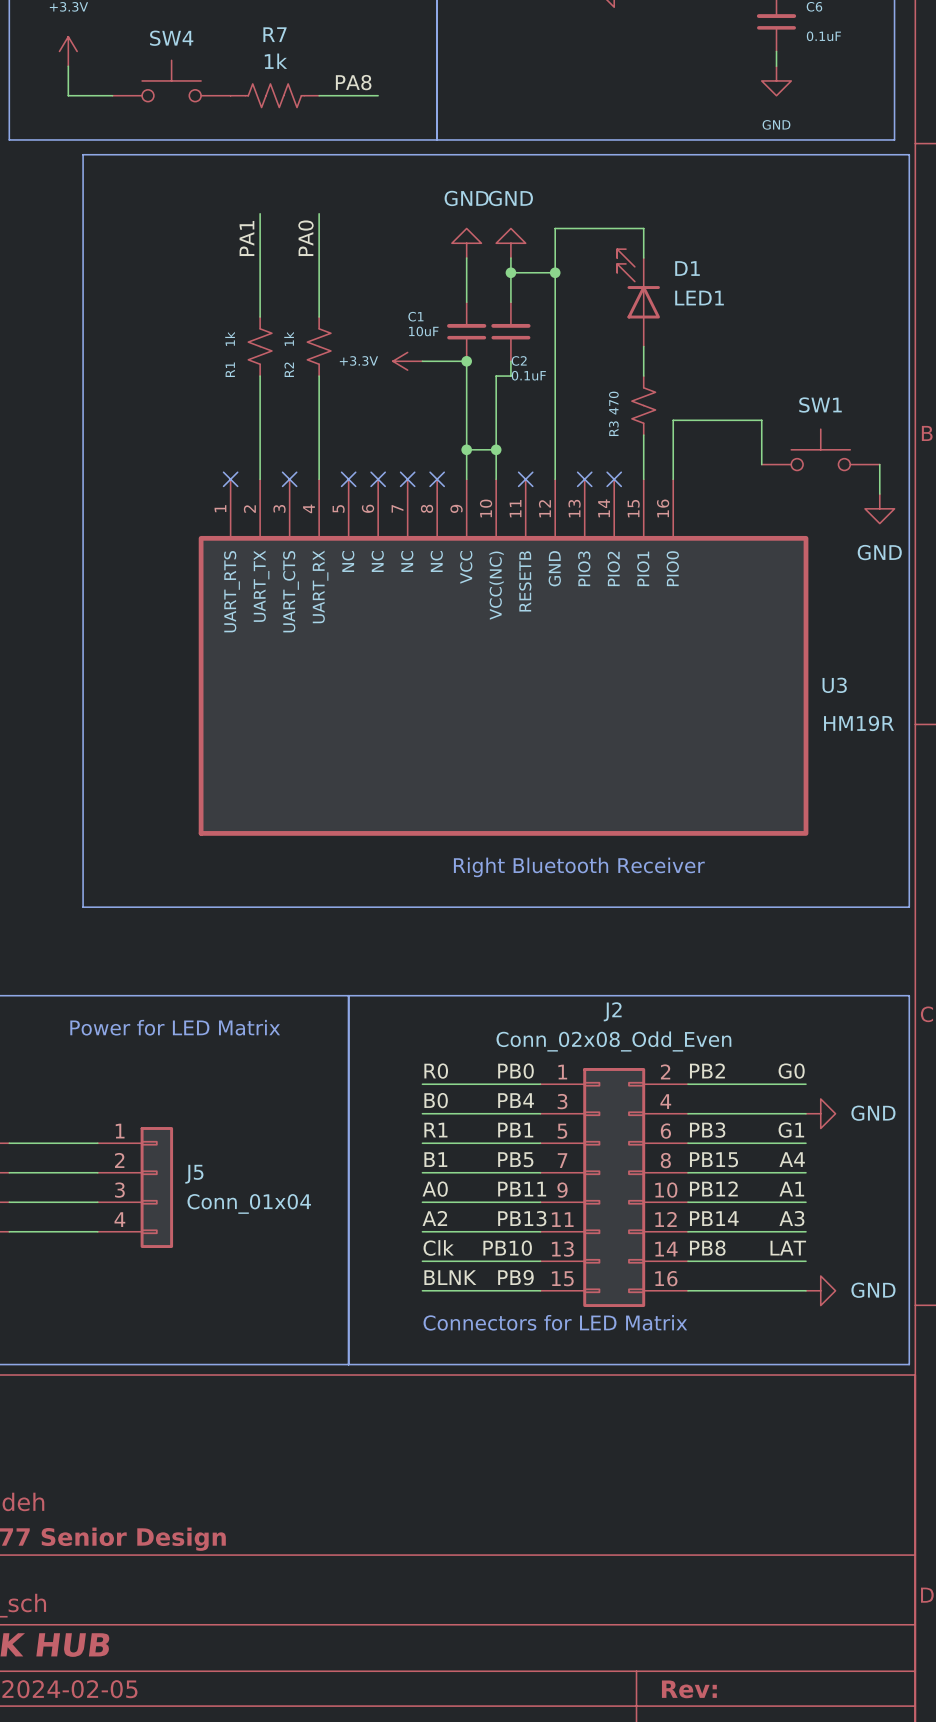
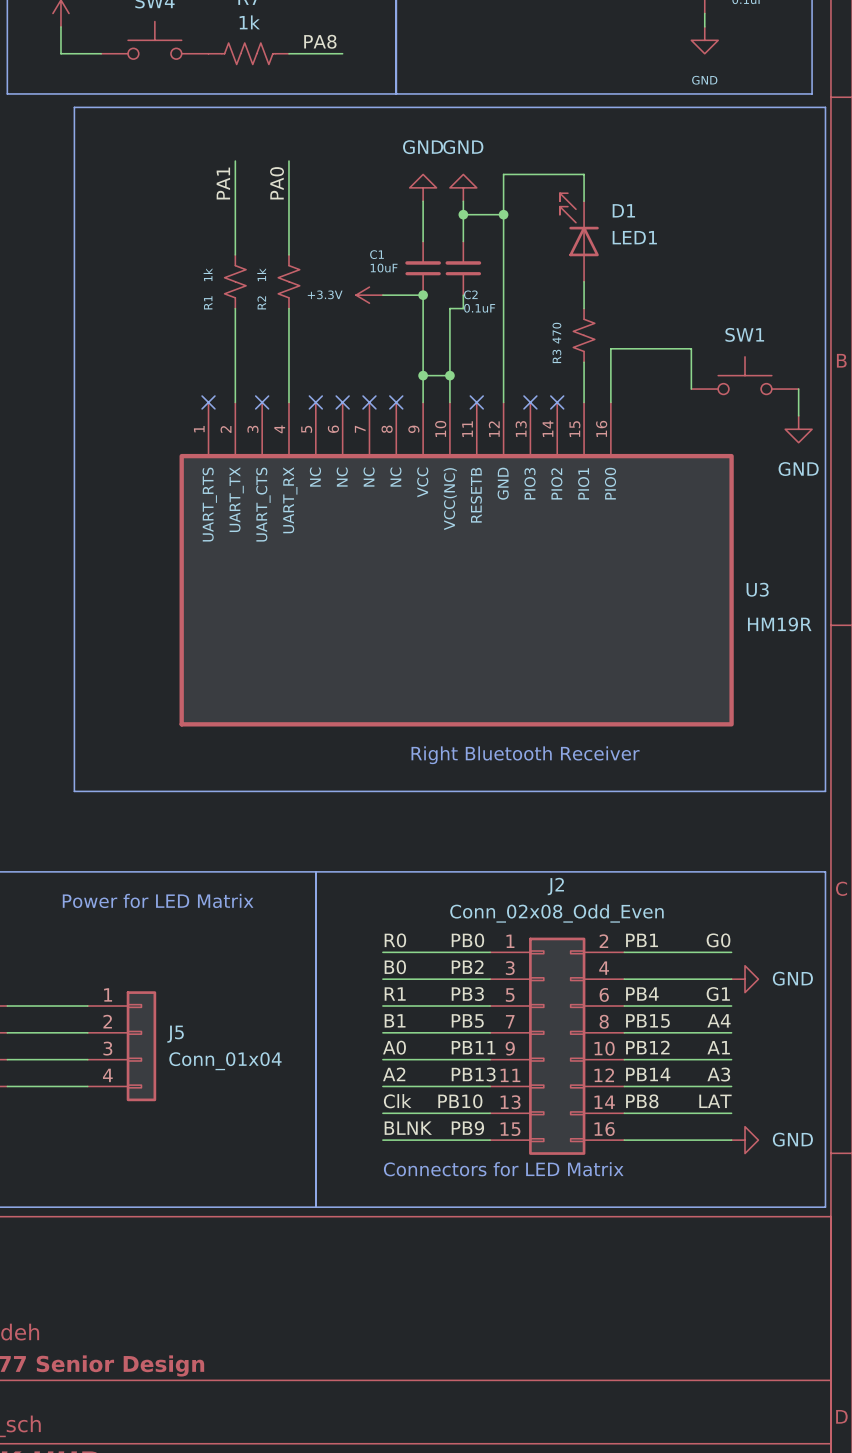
label: PB2 (707, 1070) -> PB1 (642, 940)
label: PB4 (516, 1100) -> PB2 (467, 967)
label: PB1 (515, 1130) -> PB3 (467, 994)
label: PB3 (707, 1130) -> PB4 (642, 994)

